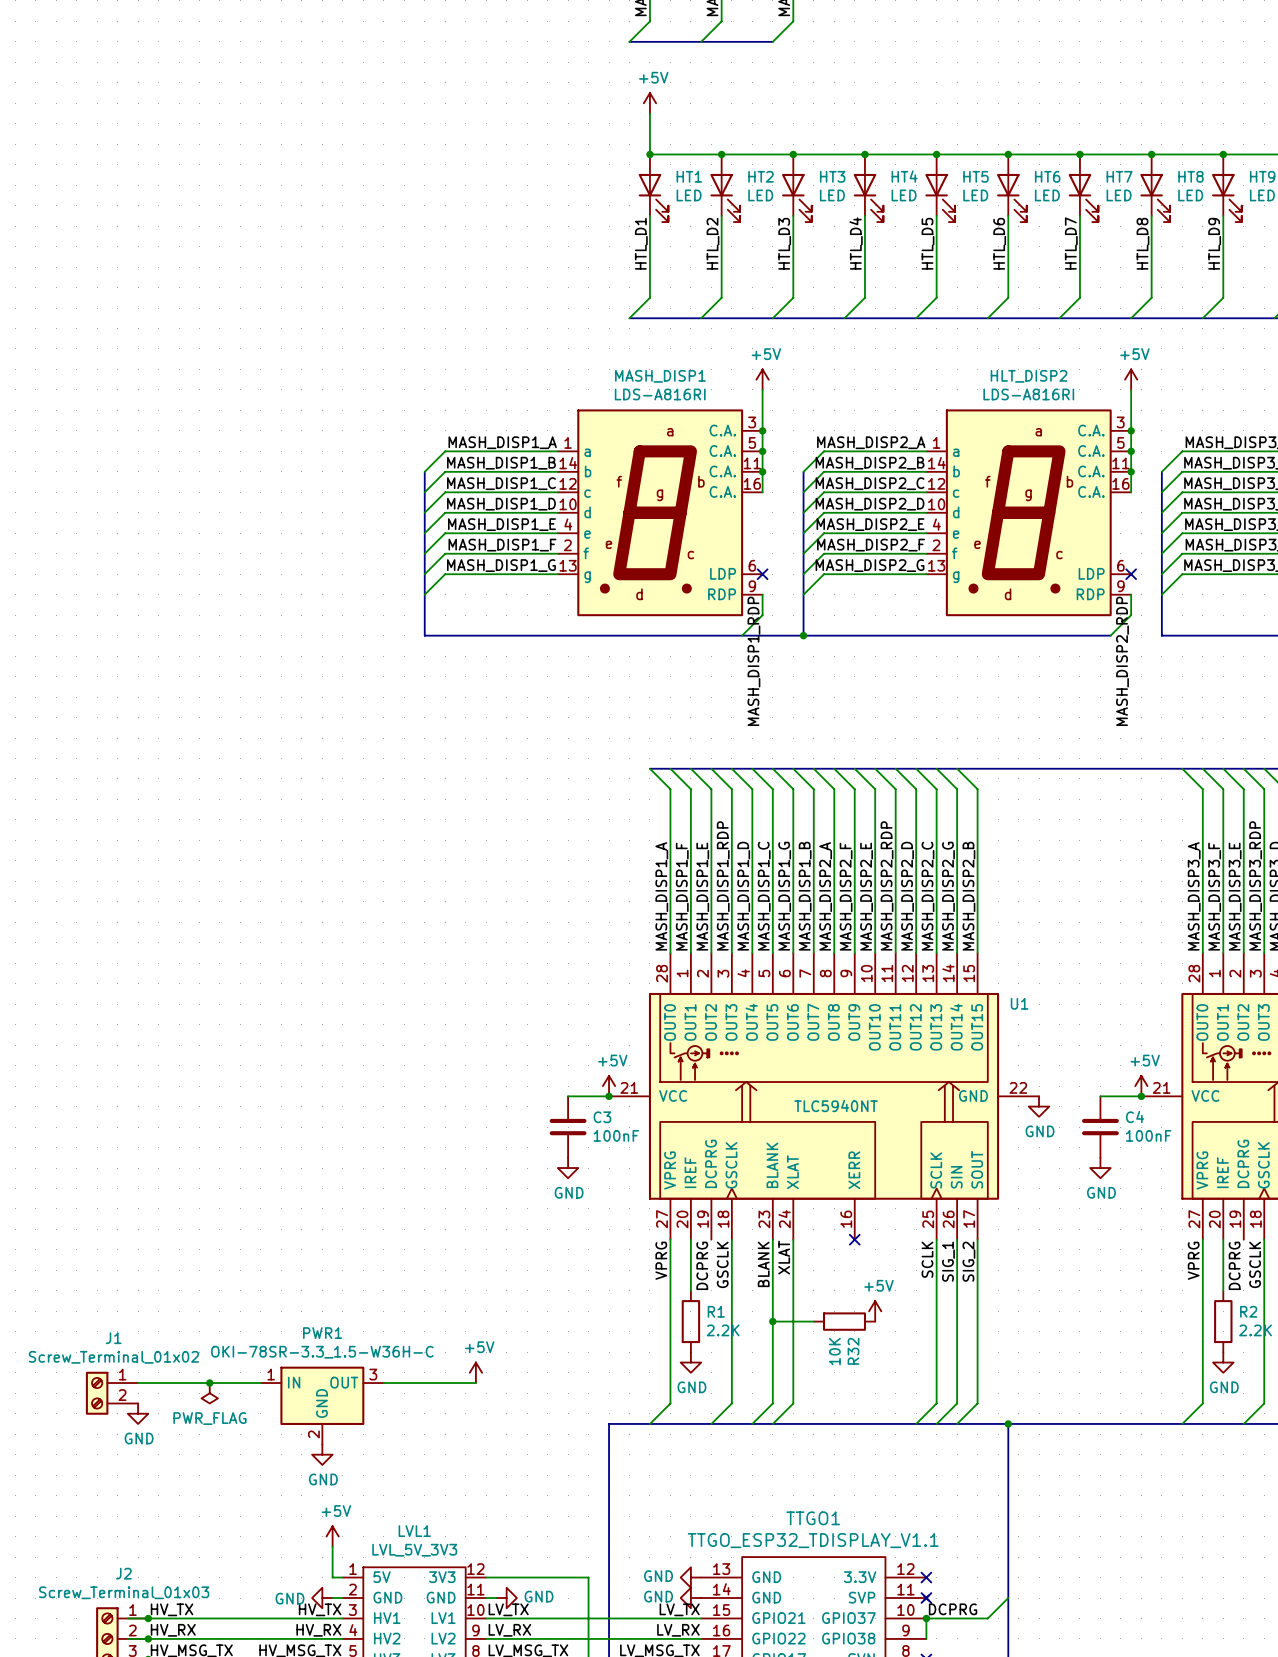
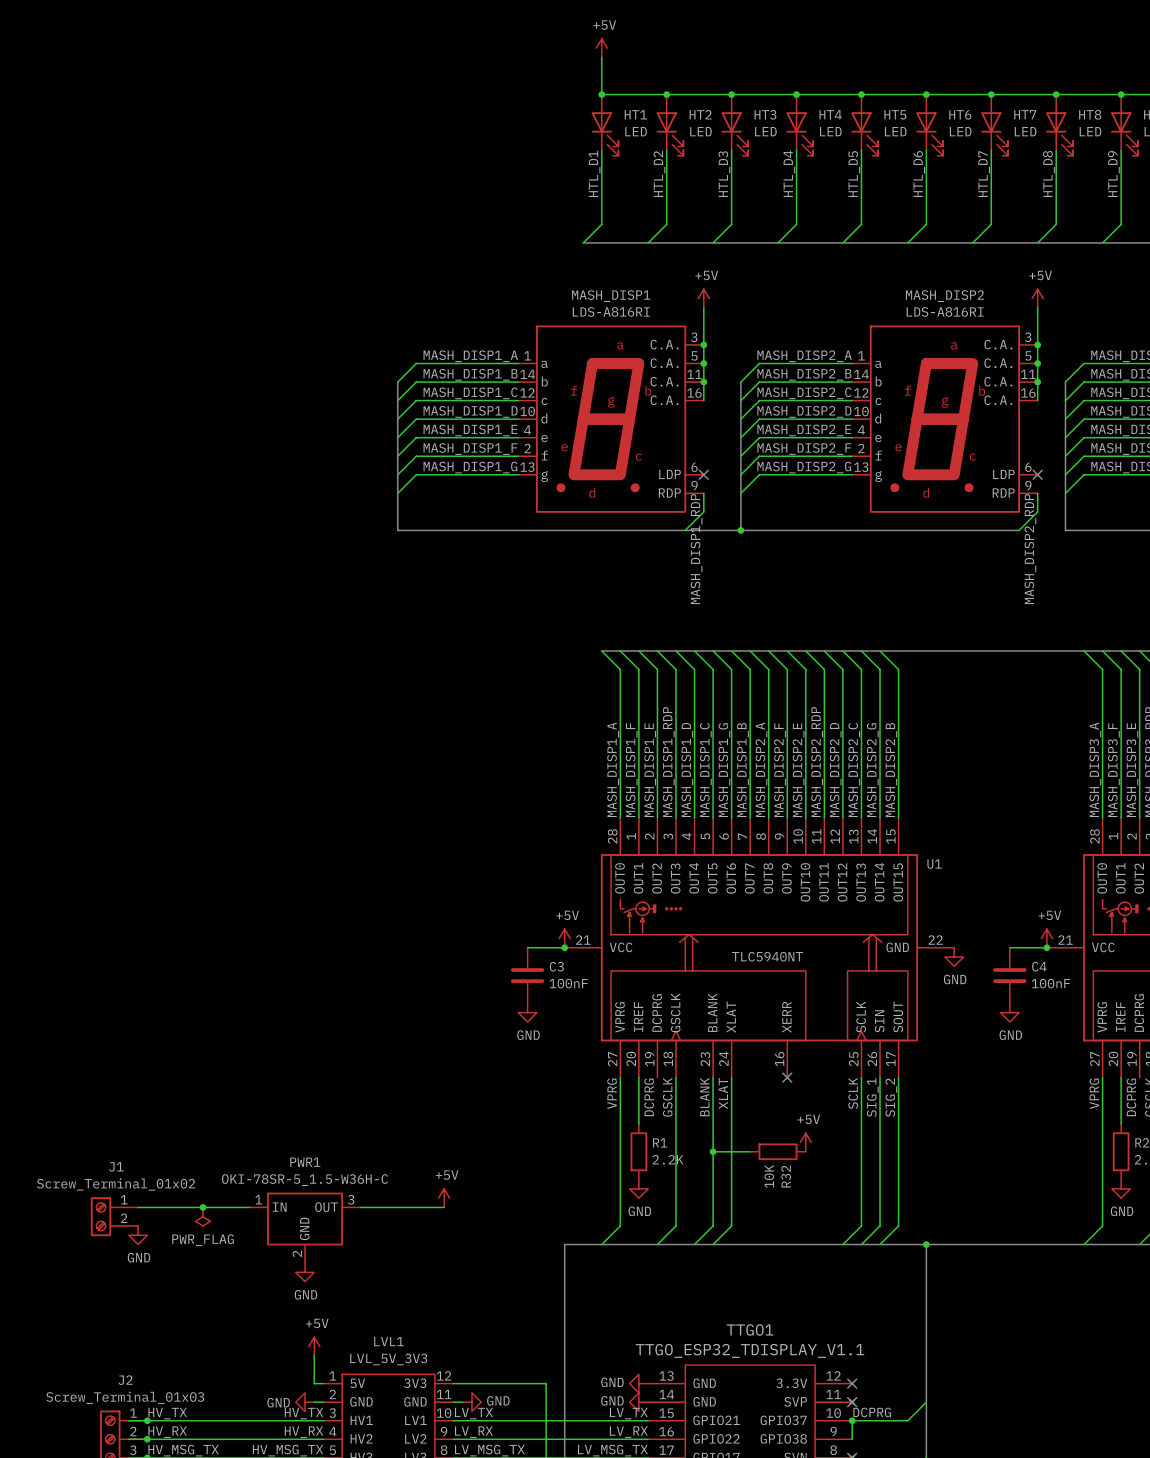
HLT_DISP2 name: HLT_DISP2 (1029, 376) -> MASH_DISP2 (944, 296)
PWR1 value: OKI-78SR-3.3_1.5-W36H-C (322, 1352) -> OKI-78SR-5_1.5-W36H-C (304, 1180)

